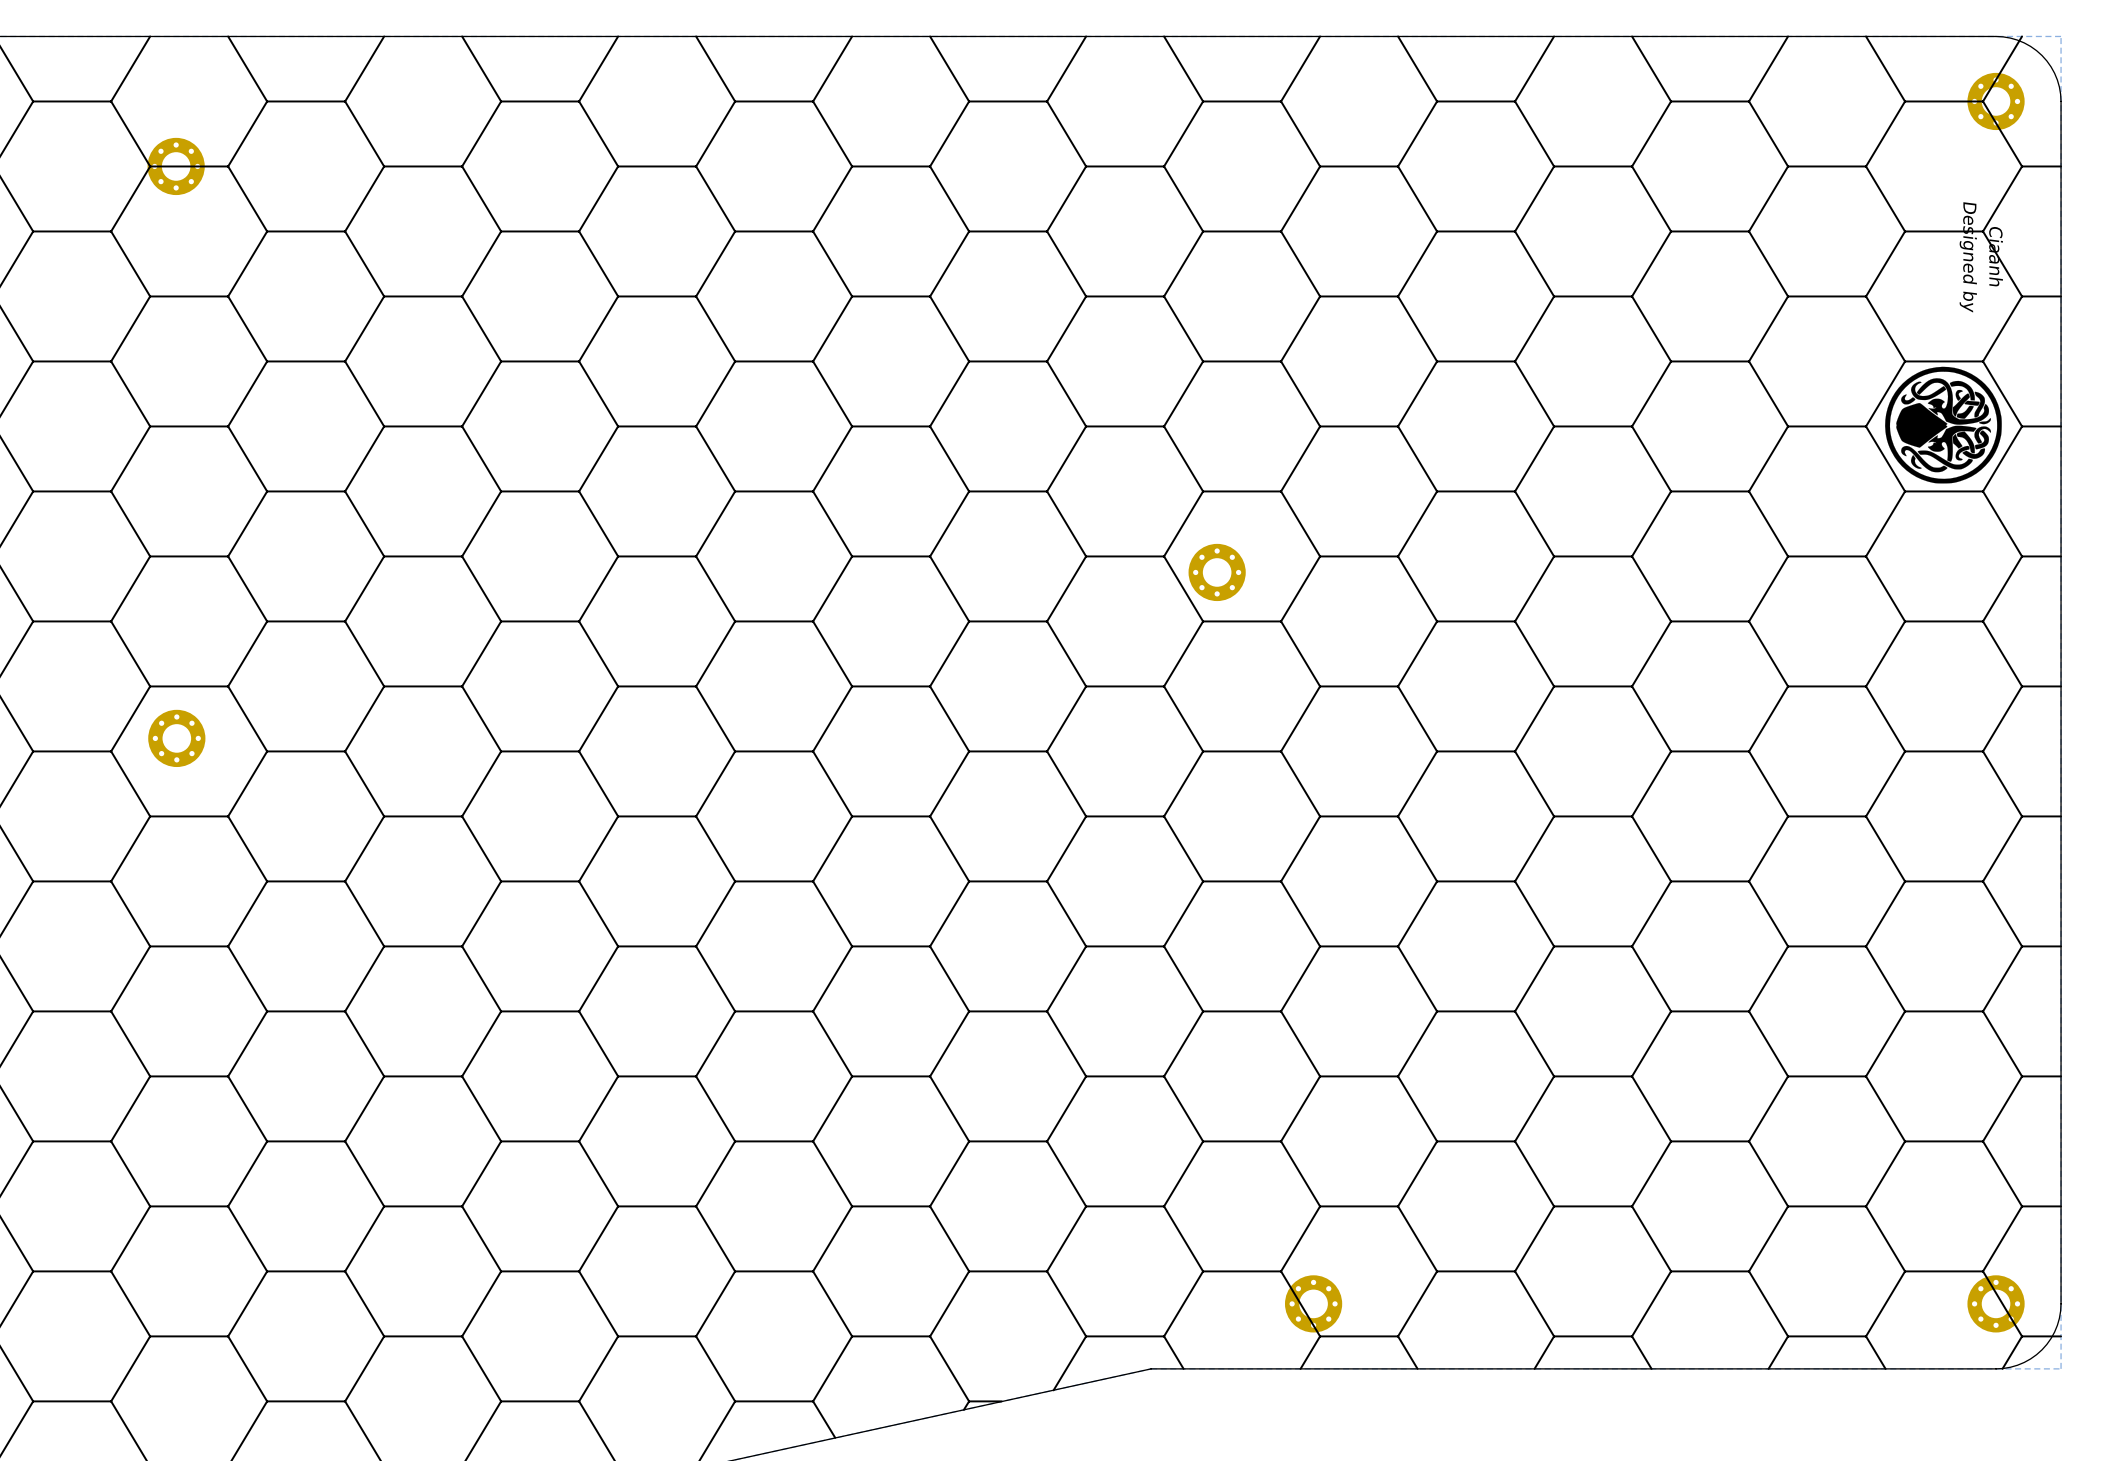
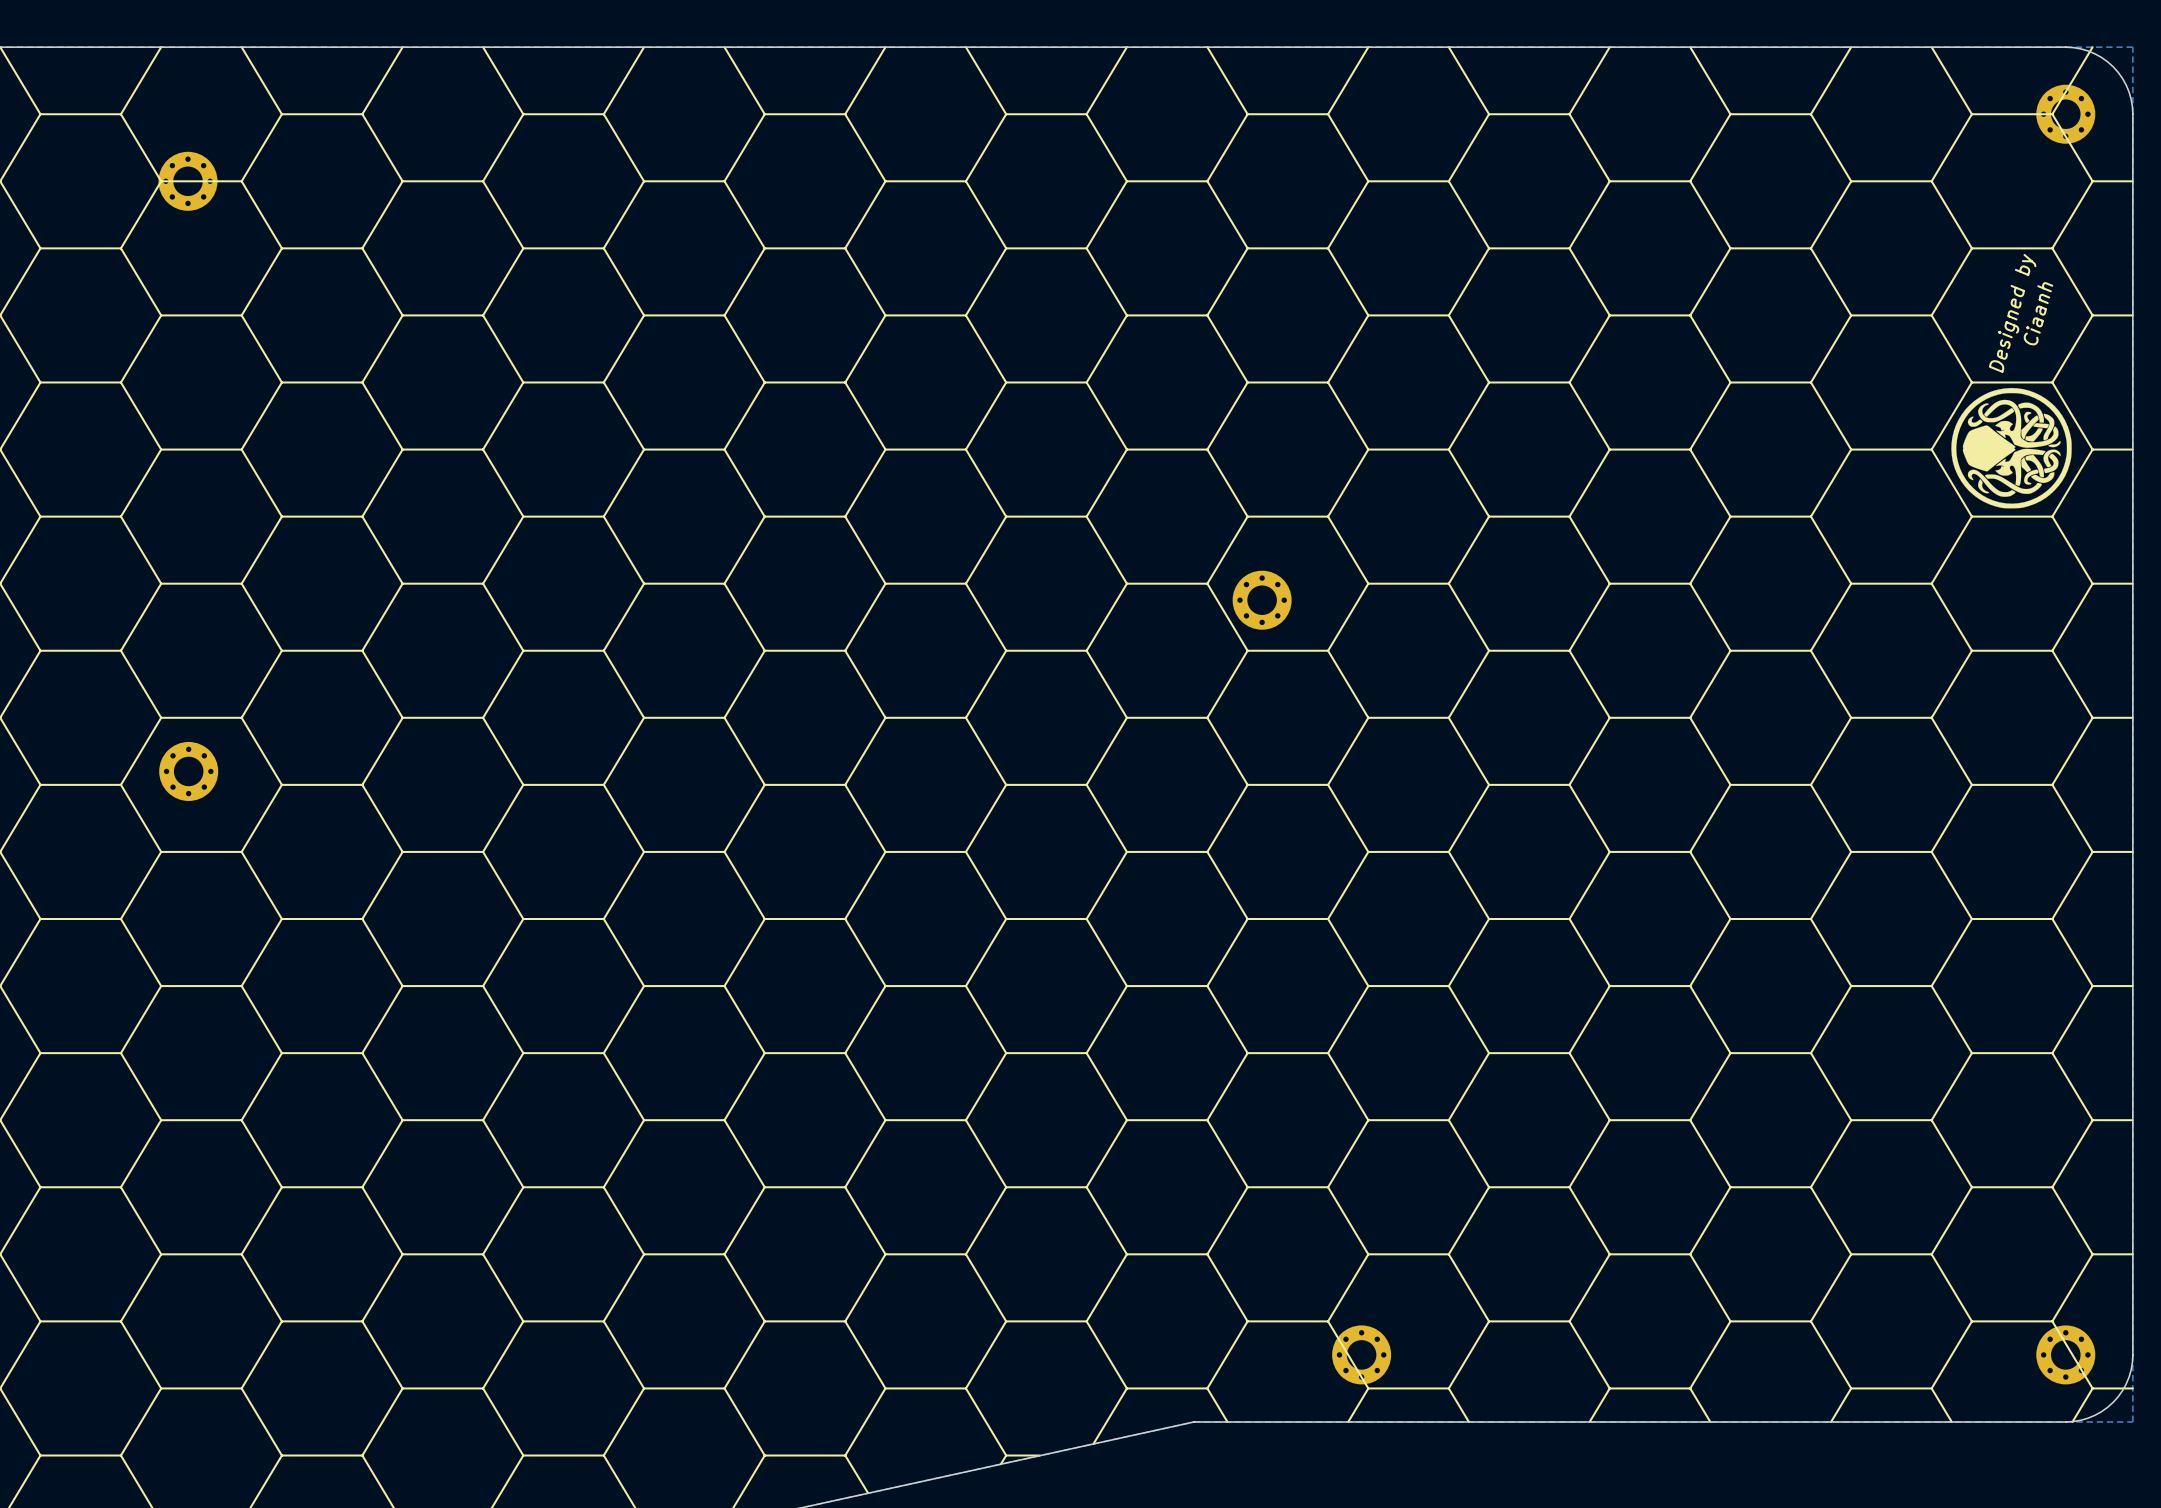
drawing shape: [1885, 202, 2003, 484] -> [1951, 253, 2072, 509]

